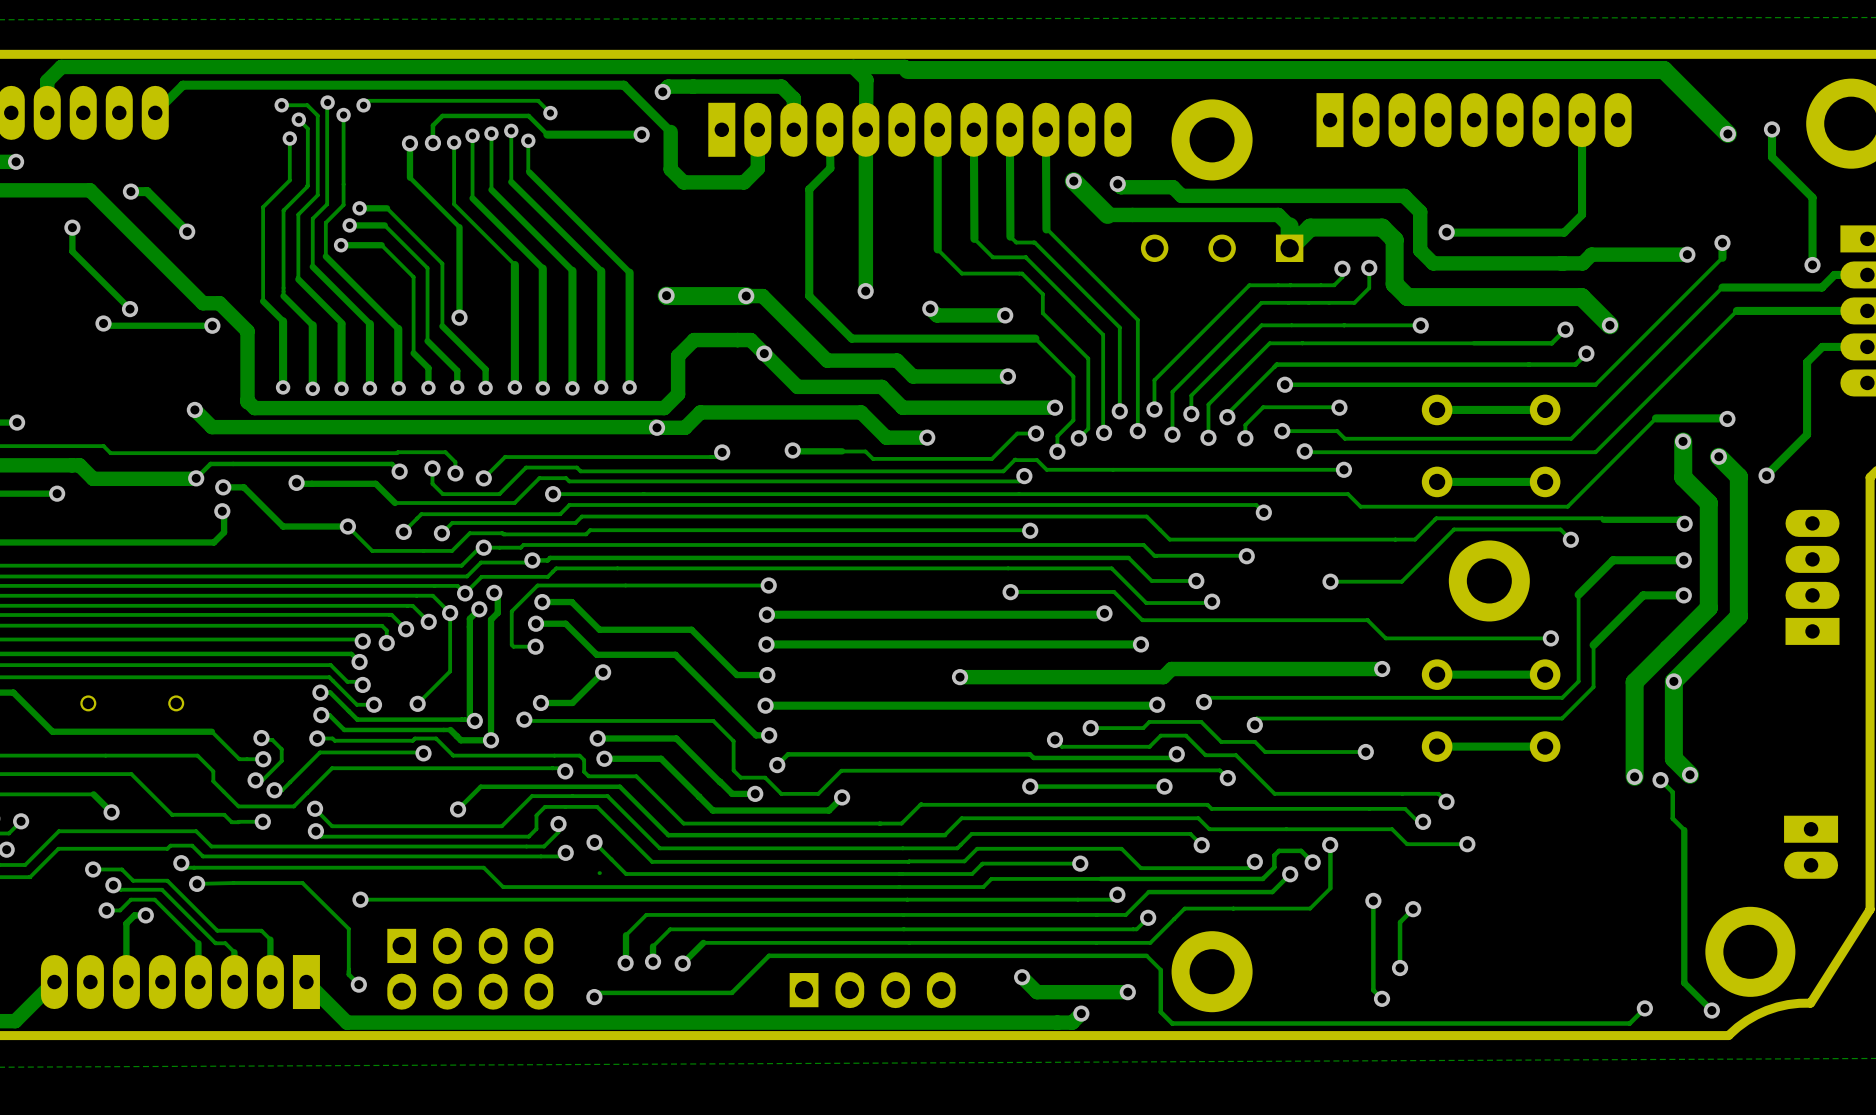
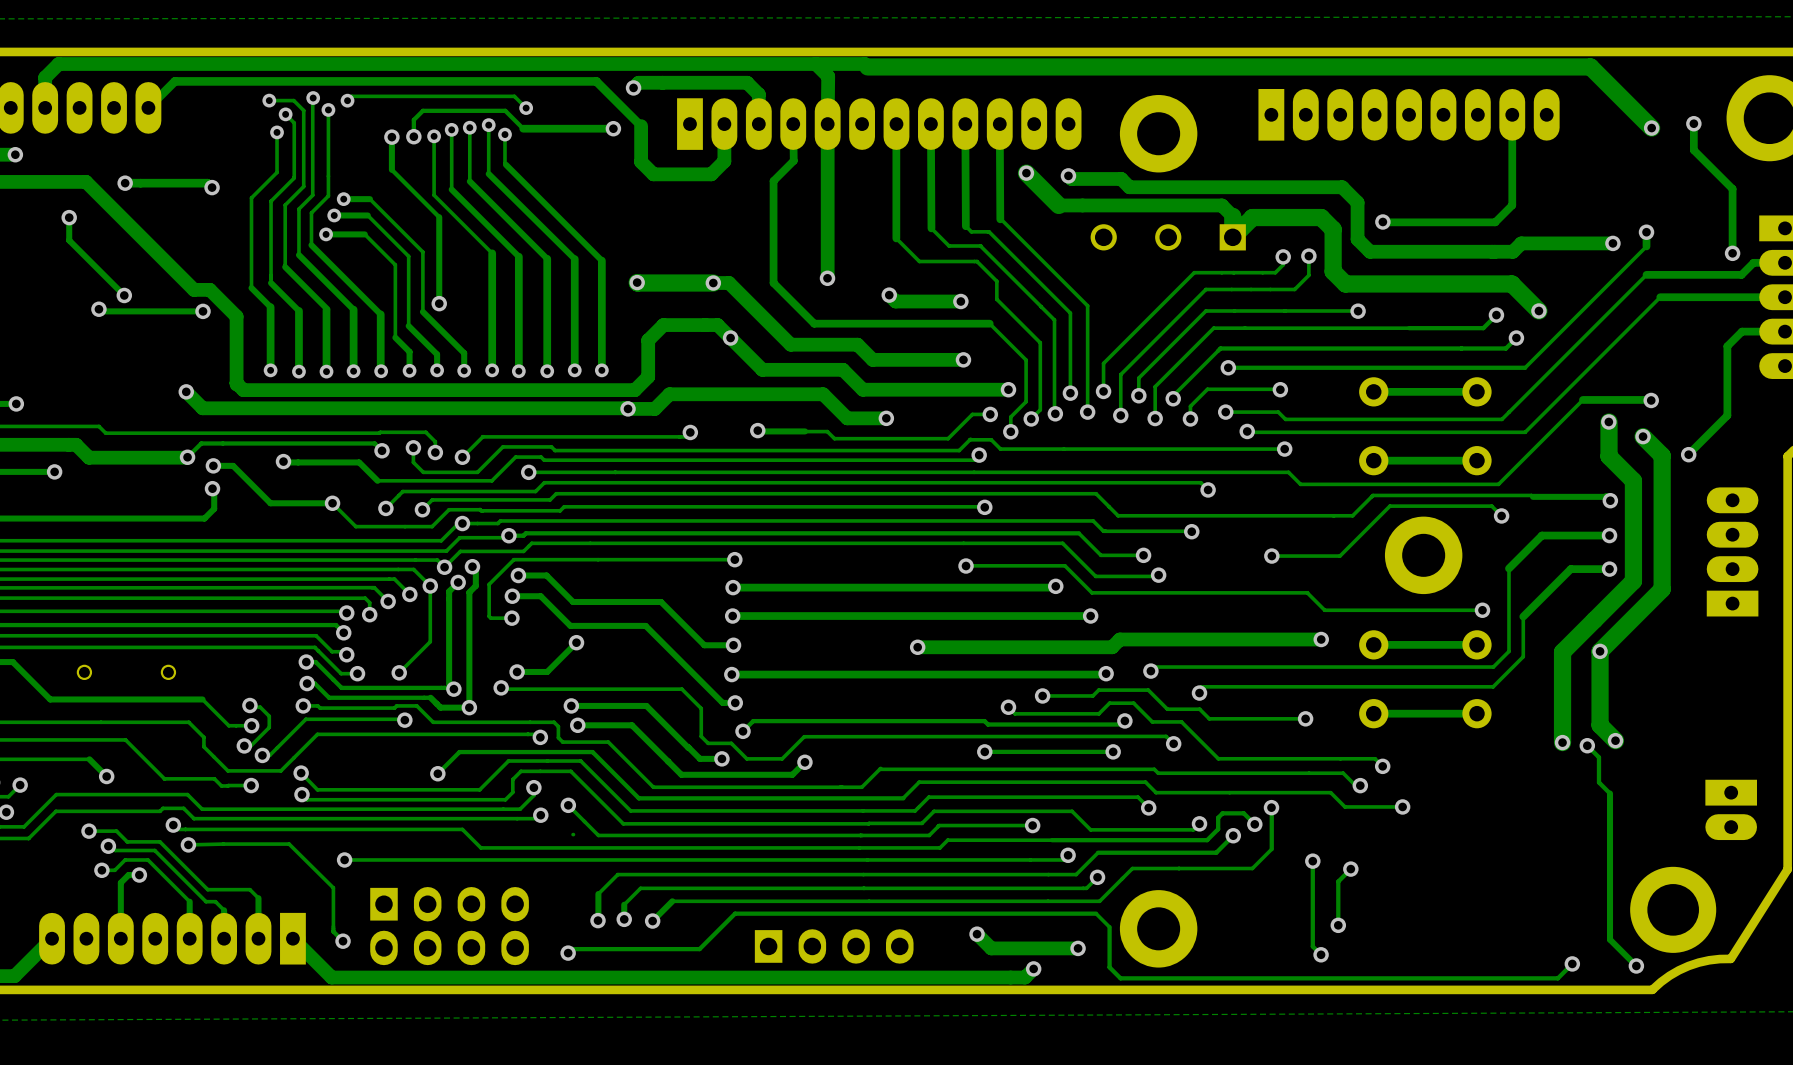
track: (147, 191) (187, 231) -> (140, 183) (207, 183) (212, 187)
via position: (187, 231) -> (212, 187)

